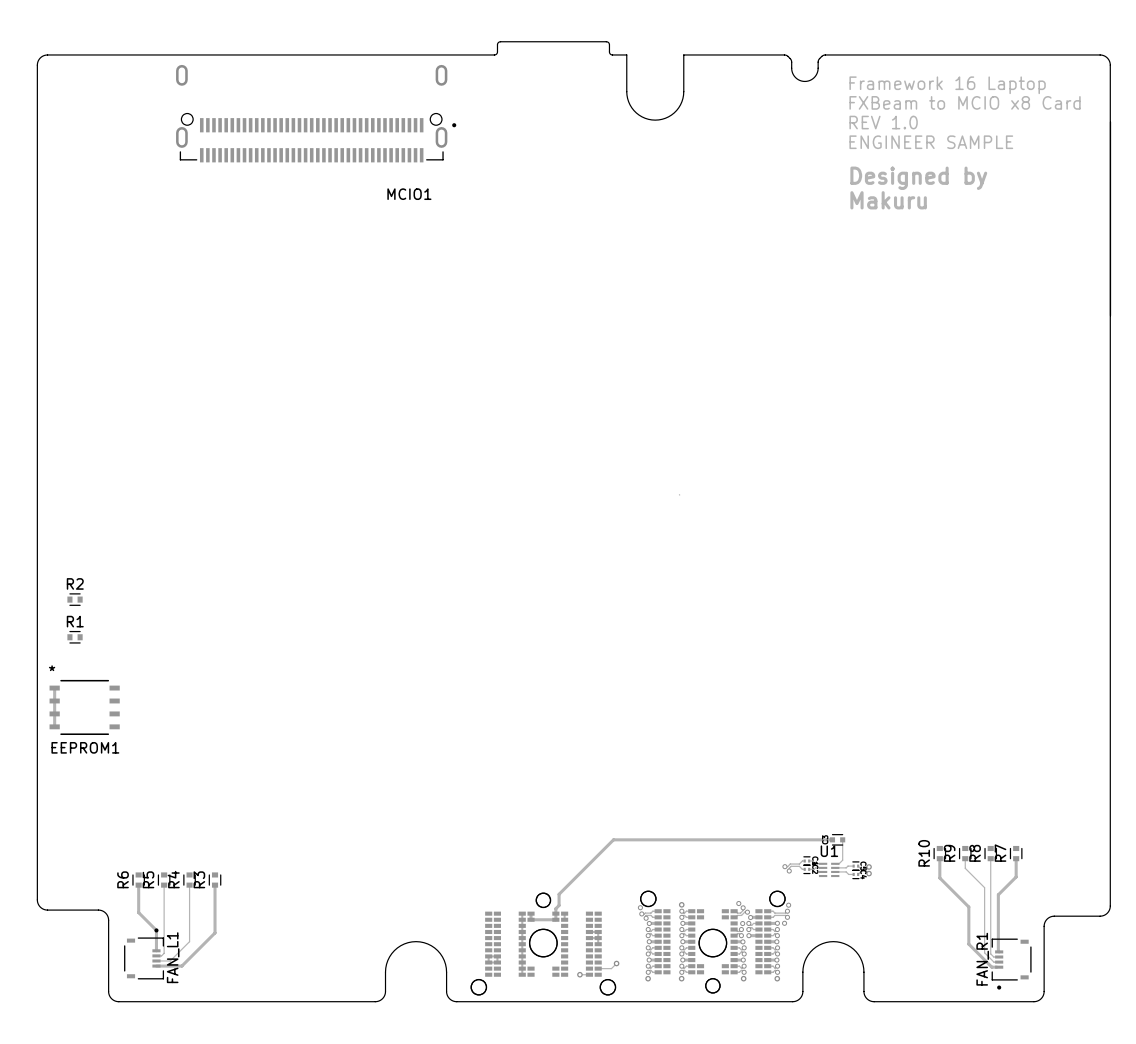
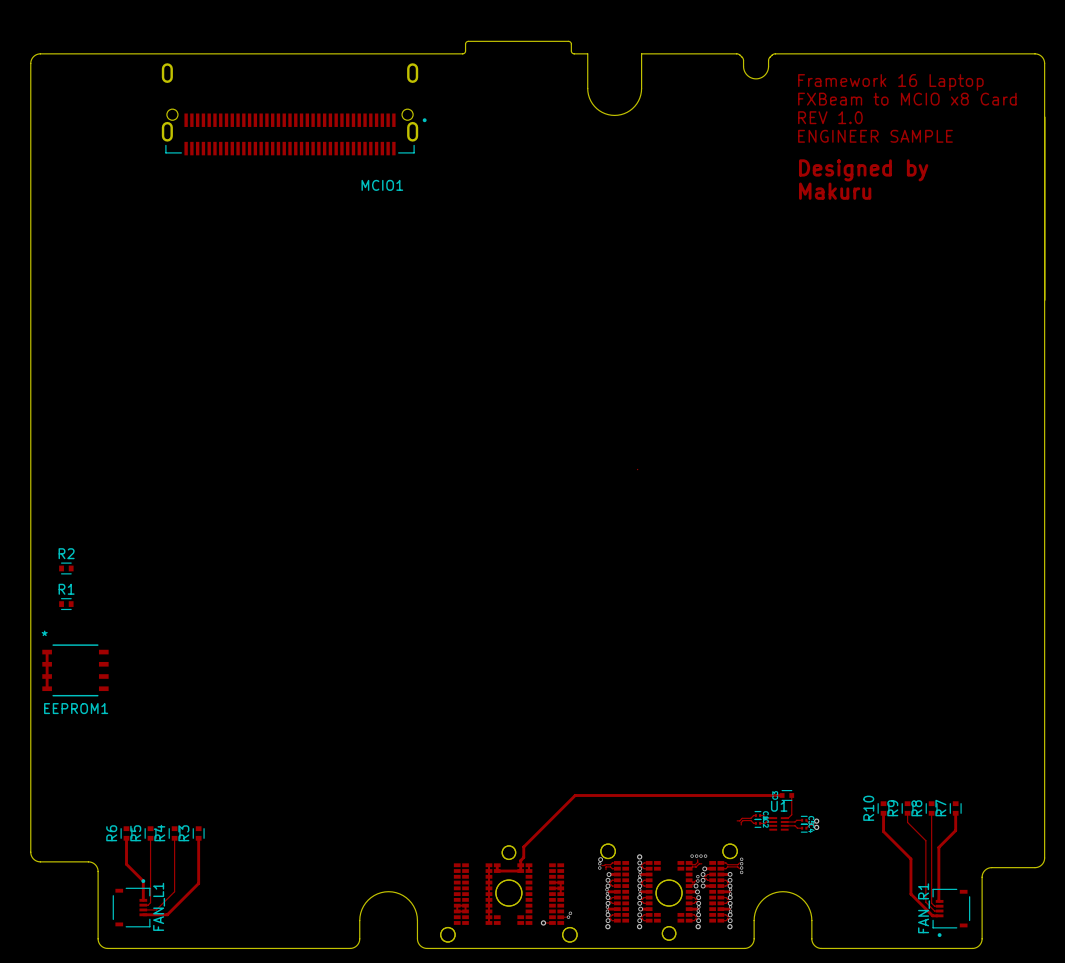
via: (784, 866) -> none
via: (789, 871) -> none
via: none -> (692, 856)
via: (738, 903) -> none
via: none -> (696, 856)
via: none -> (700, 856)
via: none -> (705, 856)
via: (788, 905) -> none
via: (743, 907) -> none
via: none -> (741, 859)
via: none -> (599, 863)
via: (787, 911) -> none
via: none -> (741, 863)
via: (747, 912) -> none
via: (641, 913) -> none
via: none -> (599, 868)
via: none -> (741, 868)
via: (787, 917) -> none
via: (646, 918) -> none
via: none -> (640, 872)
via: none -> (741, 872)
via: (682, 923) -> none
via: (742, 923) -> none
via: (784, 923) -> none
via: none -> (639, 876)
via: none -> (697, 876)
via: (741, 929) -> none
via: none -> (697, 880)
via: none -> (606, 889)
via: none -> (639, 889)
via: none -> (730, 889)
via: (649, 941) -> none
via: (682, 941) -> none
via: (776, 941) -> none
via: none -> (607, 893)
via: none -> (640, 893)
via: none -> (730, 893)
via: none -> (607, 907)
via: none -> (698, 907)
via: none -> (730, 906)
via: (649, 960) -> none
via: (743, 960) -> none
via: (776, 960) -> none
via: none -> (698, 910)
via: none -> (607, 911)
via: none -> (730, 911)
track: (616, 963) (611, 968) (606, 968) -> none
via: (616, 963) -> none
via: none -> (570, 913)
via: none -> (568, 917)

